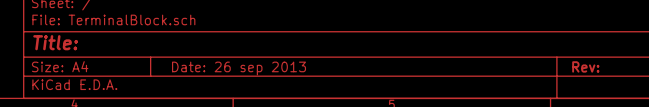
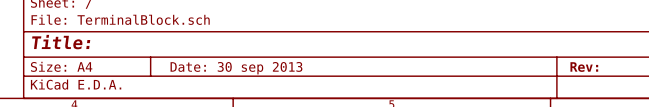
title block: Date: 26 sep 2013 (239, 68) -> Date: 30 sep 2013 (236, 68)

